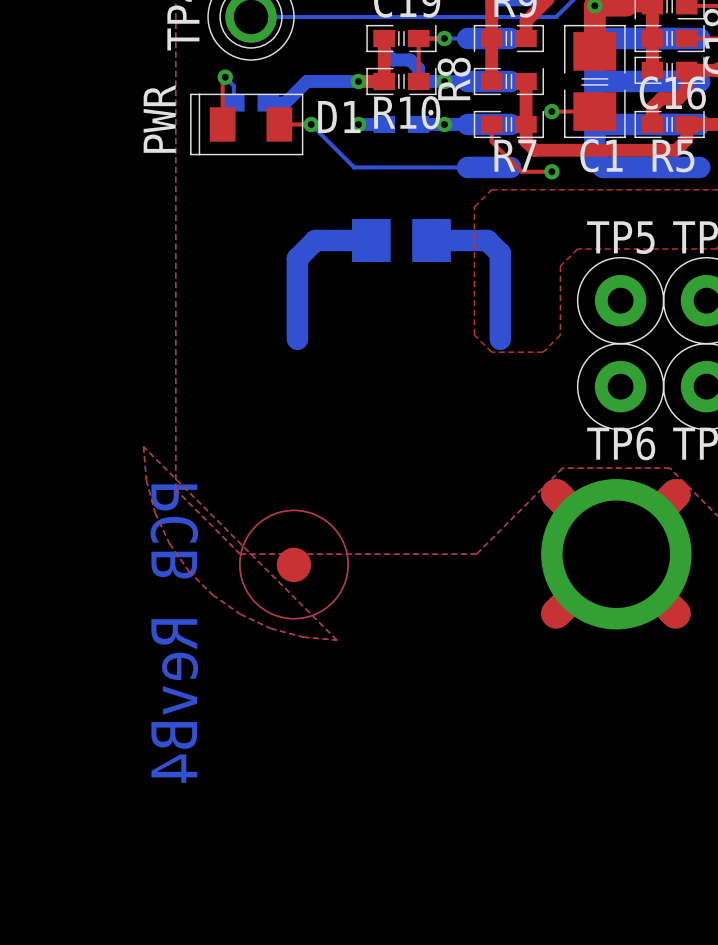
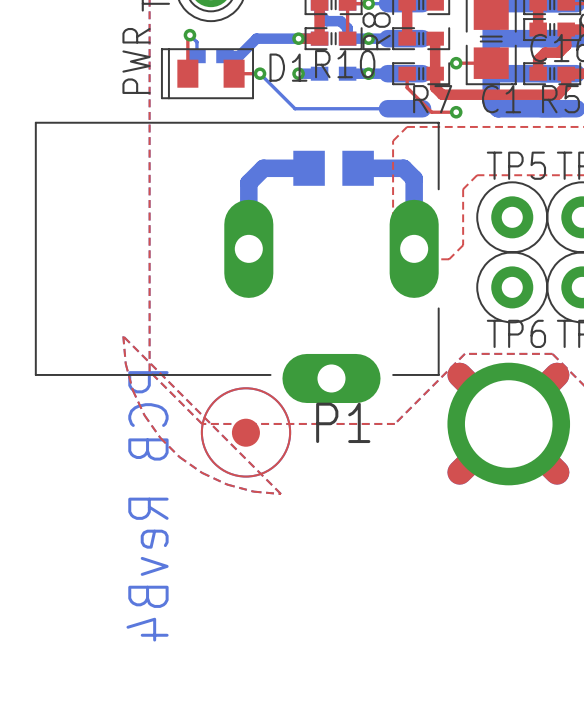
P1: none -> (237, 262)

